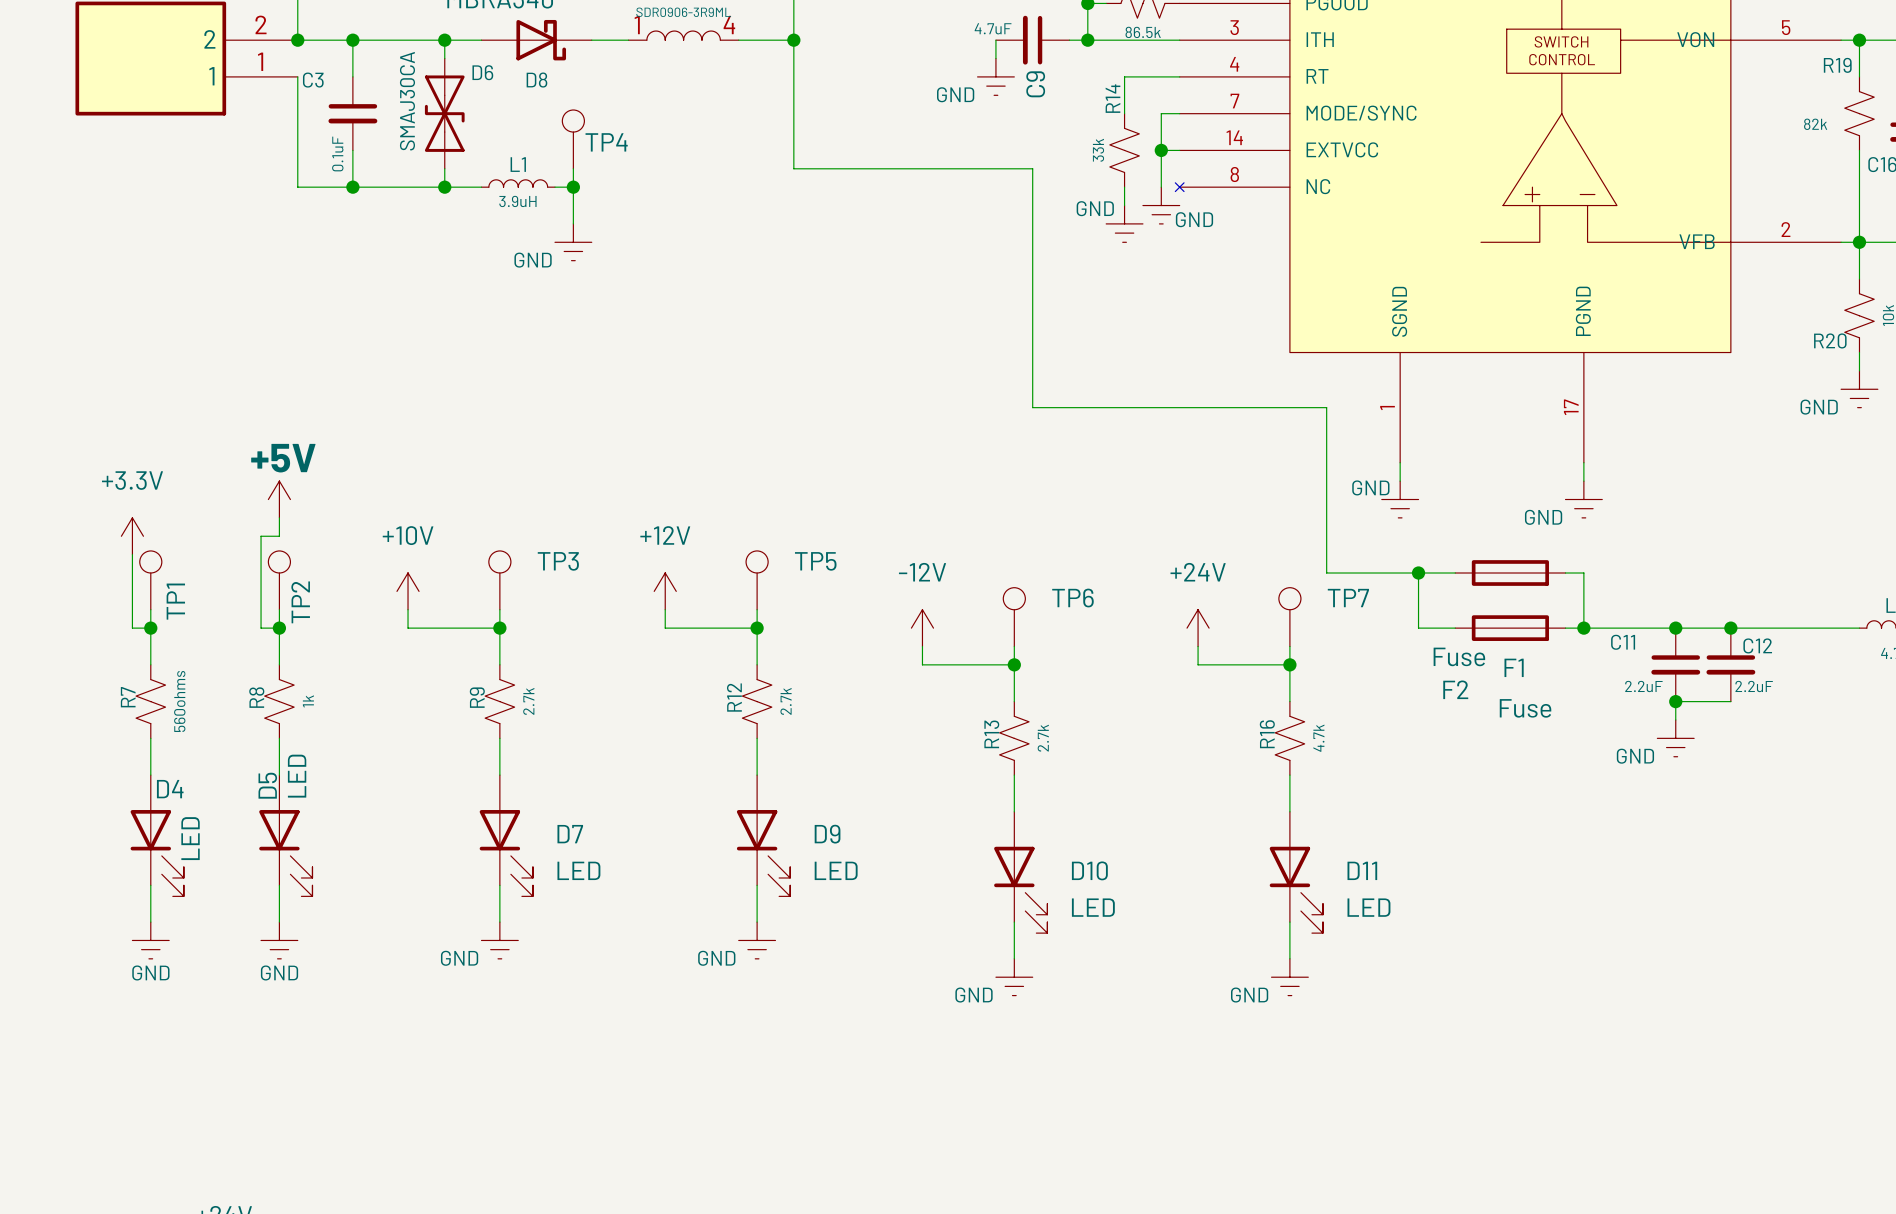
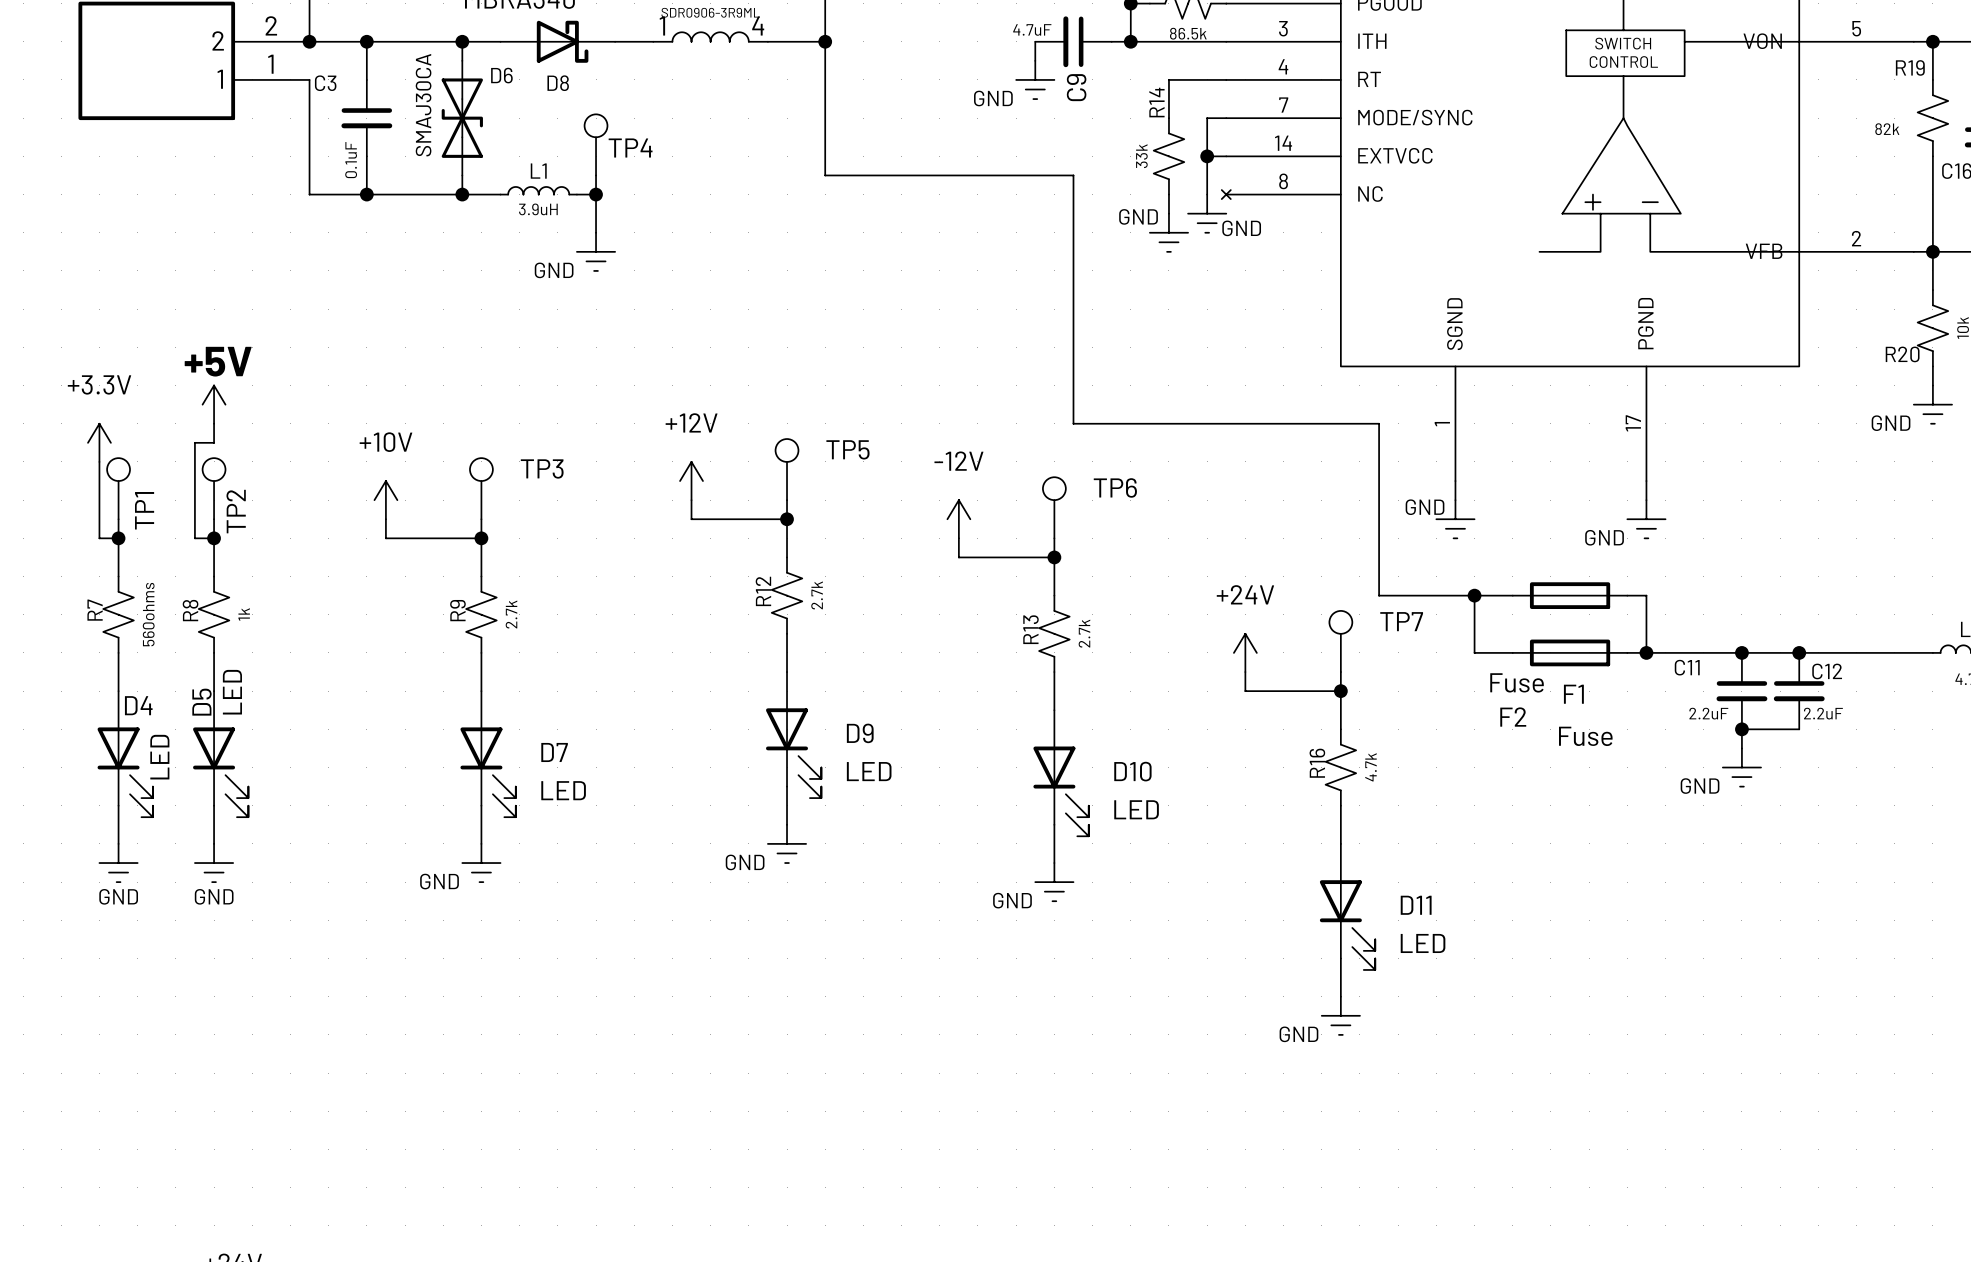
wire: none -> (787, 500) (787, 557)
power symbol position: +5V (279, 499) -> +5V (214, 404)
junction: none -> (787, 519)
junction: none -> (118, 538)
junction: none -> (214, 538)
wire: (279, 517) (279, 536) (261, 536) (261, 628) (279, 628) -> (214, 423) (214, 442) (194, 442) (194, 538) (214, 538)
junction: none -> (481, 538)
wire: none -> (1054, 538) (1054, 595)
power symbol position: +3.3V (132, 536) -> +3.3V (99, 442)
junction: none -> (1054, 557)
wire: (132, 554) (132, 628) (150, 628) -> (99, 461) (99, 538) (118, 538)
TP1 position: (150, 580) -> (118, 488)
TP2 position: (279, 580) -> (214, 488)
TP3 position: (499, 580) -> (481, 488)
TP5 position: (757, 580) -> (787, 469)
power symbol position: +10V (408, 591) -> +10V (385, 500)
power symbol position: +12V (665, 591) -> +12V (691, 481)
wire: (150, 609) (150, 664) -> (118, 519) (118, 576)
wire: (279, 609) (279, 664) -> (214, 519) (214, 576)
wire: (408, 609) (408, 628) (499, 628) -> (385, 519) (385, 538) (481, 538)
wire: (499, 609) (499, 664) -> (481, 519) (481, 576)
wire: (665, 609) (665, 628) (757, 628) -> (691, 500) (691, 519) (787, 519)
TP6 position: (1014, 617) -> (1054, 507)
junction: (150, 628) -> none
junction: (279, 628) -> none
junction: (499, 628) -> none
junction: (757, 628) -> none
power symbol position: -12V (922, 628) -> -12V (958, 519)
wire: (922, 646) (922, 664) (1014, 664) -> (958, 538) (958, 557) (1054, 557)
junction: (1014, 664) -> none
R7 position: (150, 701) -> (118, 614)
R8 position: (279, 701) -> (214, 614)
R9 position: (499, 701) -> (481, 614)
R12 position: (757, 701) -> (787, 595)
wire: (150, 738) (150, 775) -> (118, 652) (118, 691)
wire: (279, 738) (279, 775) -> (214, 652) (214, 691)
wire: (499, 738) (499, 775) -> (481, 652) (481, 691)
R13 position: (1014, 738) -> (1054, 633)
power symbol: none -> GND (118, 863)
power symbol: none -> GND (214, 863)
power symbol: none -> GND (481, 863)
D4 position: (157, 835) -> (125, 754)
D5 position: (285, 835) -> (220, 754)
D7 position: (506, 835) -> (488, 754)
D9 position: (763, 835) -> (793, 735)
D10 position: (1020, 872) -> (1061, 773)
wire: (150, 885) (150, 922) -> (118, 805) (118, 843)
wire: (279, 885) (279, 922) -> (214, 805) (214, 843)
wire: (499, 885) (499, 922) -> (481, 805) (481, 843)
wire: (757, 885) (757, 922) -> none
wire: (1014, 922) (1014, 958) -> none
power symbol: GND (150, 940) -> none
power symbol: GND (279, 940) -> none
power symbol: GND (499, 940) -> none
power symbol position: GND (757, 940) -> GND (787, 843)
power symbol position: GND (1014, 977) -> GND (1054, 882)

